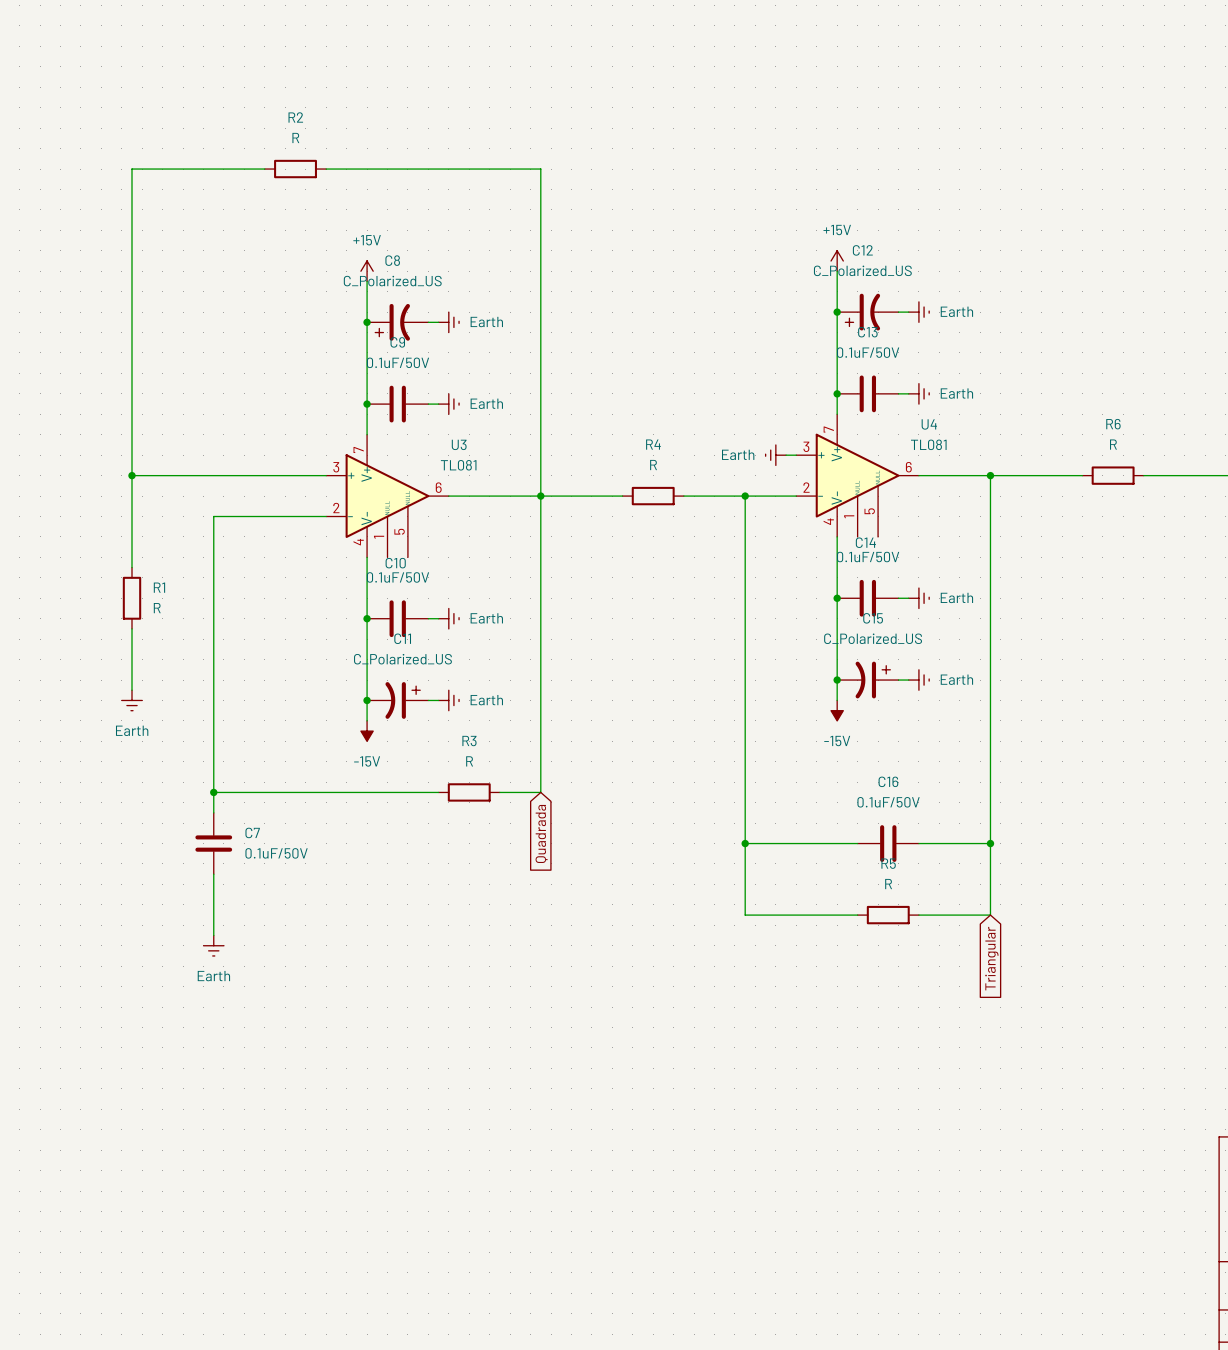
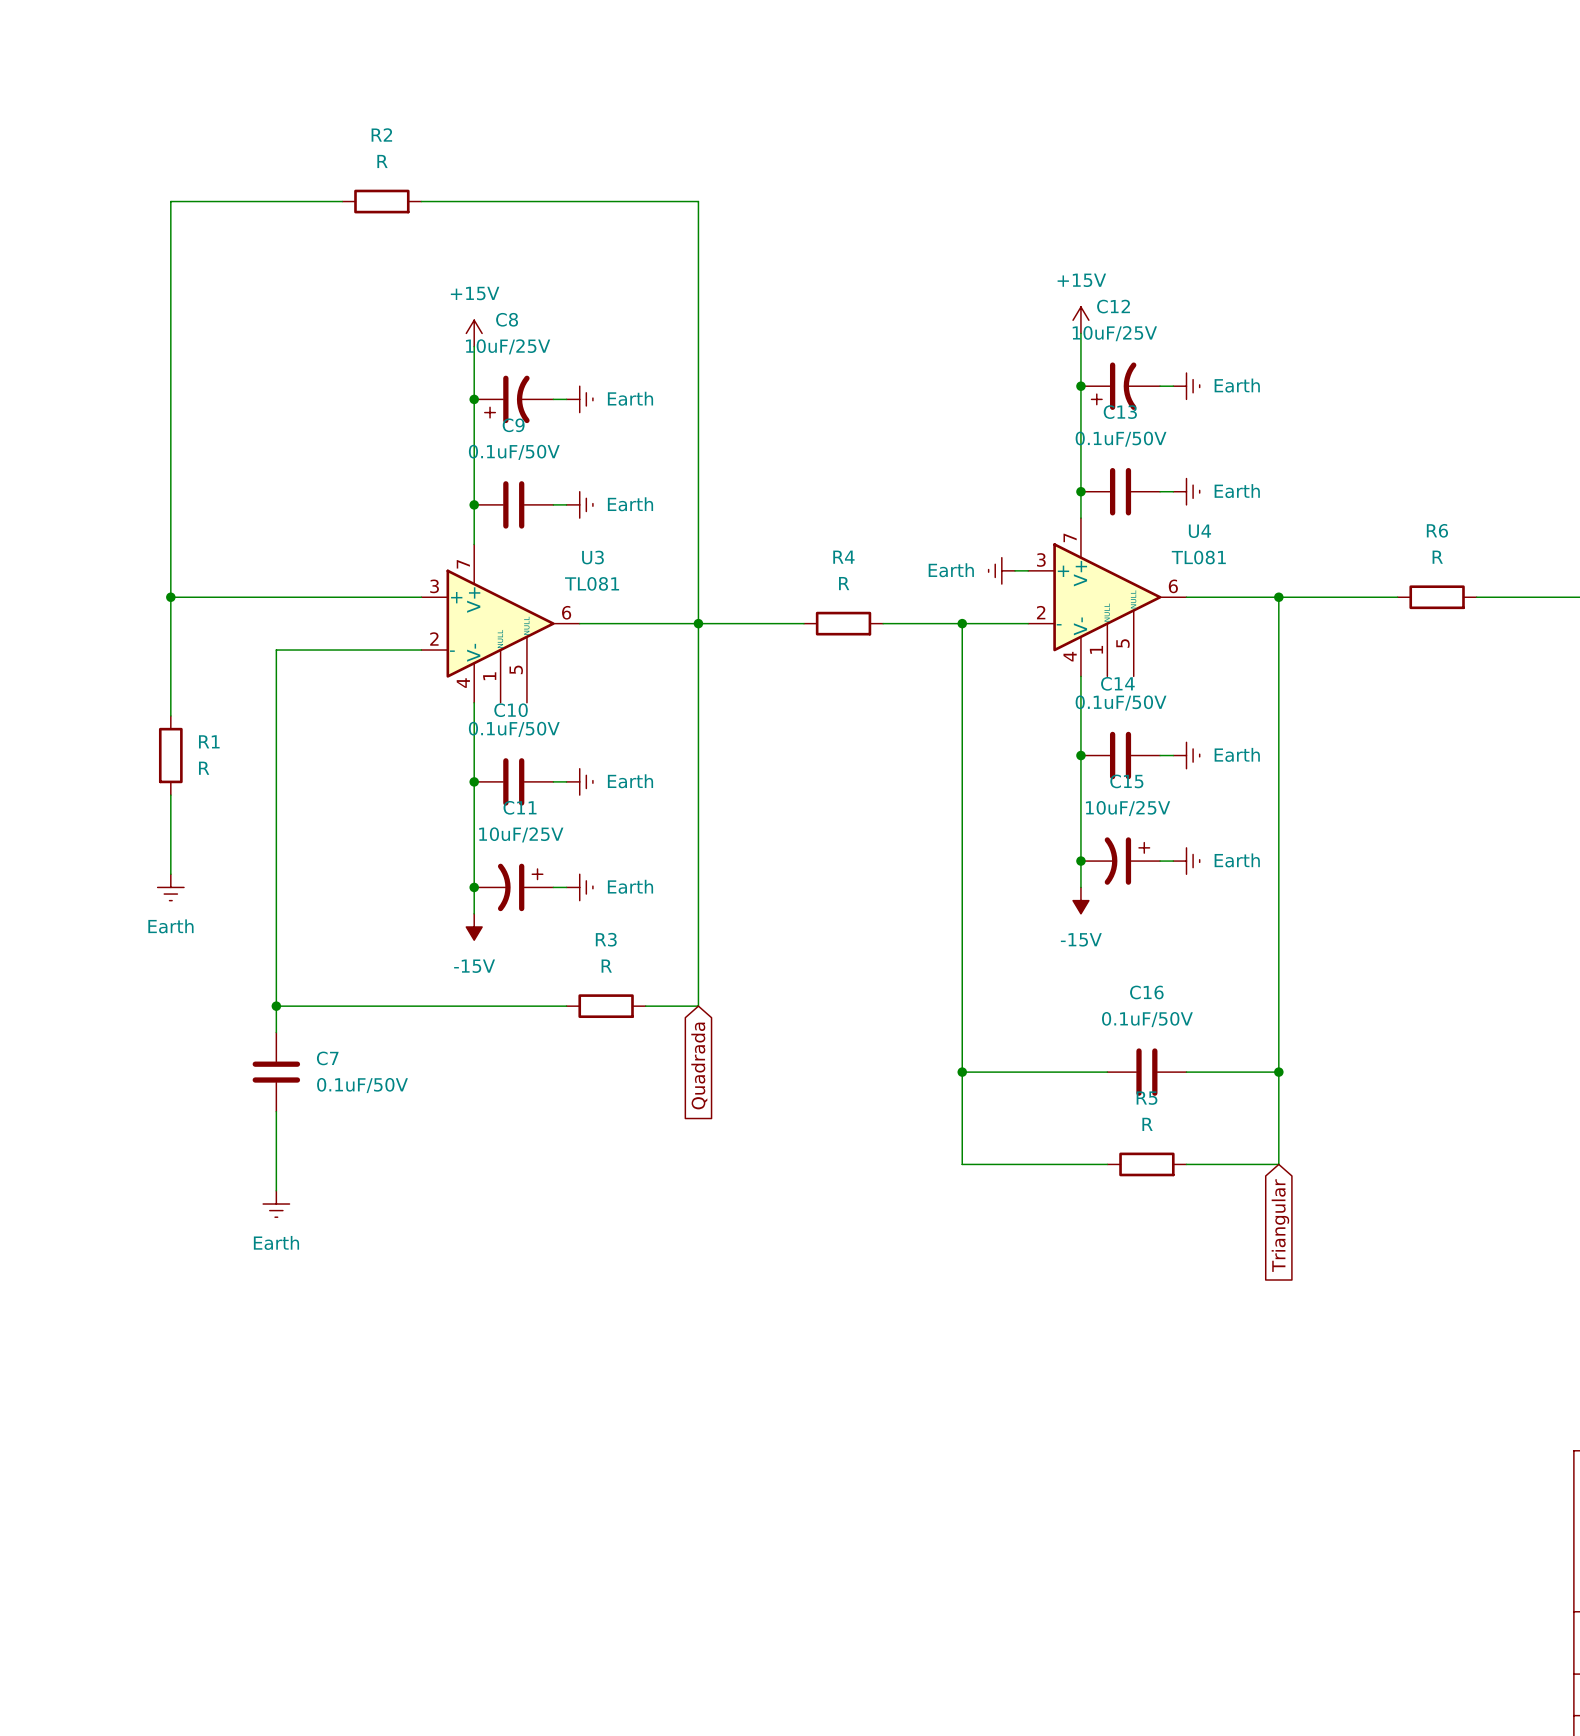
C12 value: C_Polarized_US (862, 270) -> 10uF/25V (1114, 333)
C8 value: C_Polarized_US (392, 281) -> 10uF/25V (508, 346)
C15 value: C_Polarized_US (873, 638) -> 10uF/25V (1128, 808)
C11 value: C_Polarized_US (402, 659) -> 10uF/25V (521, 834)

